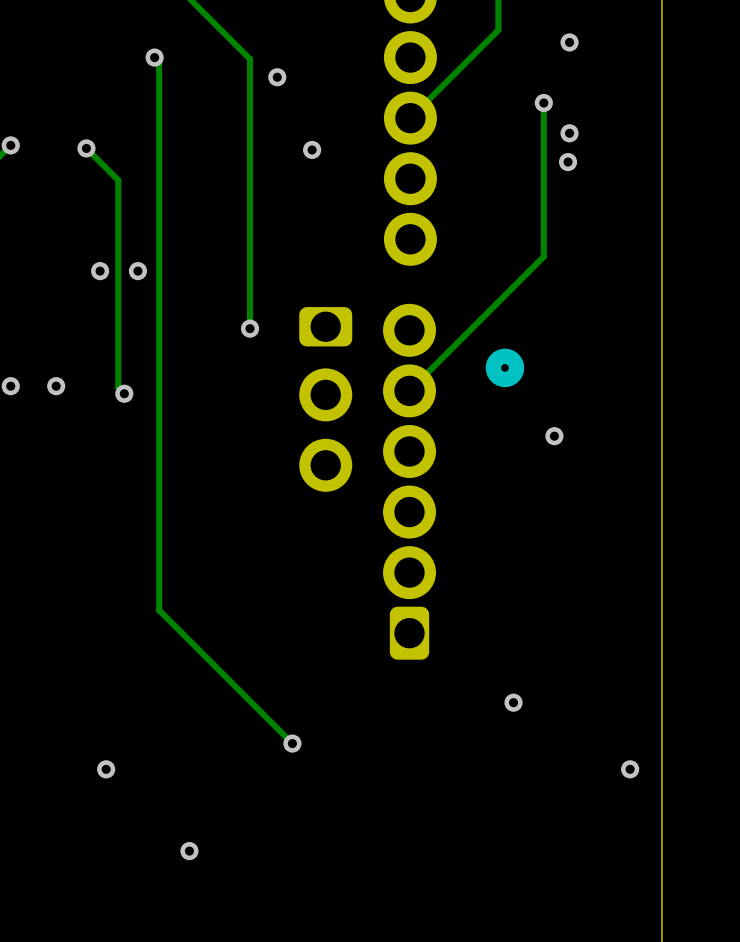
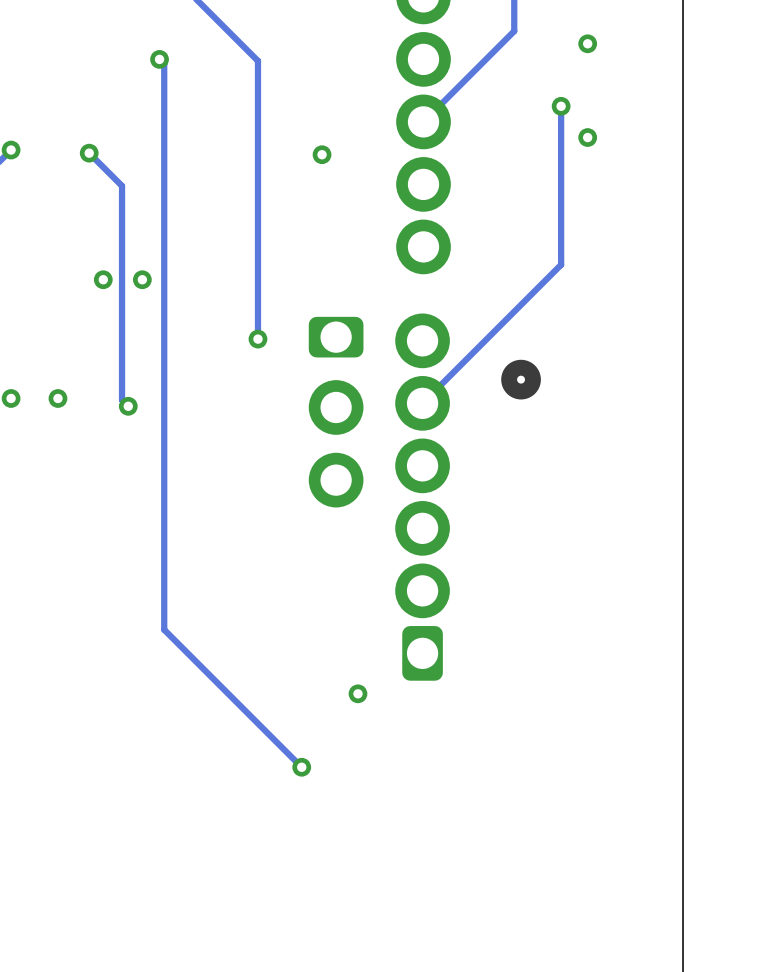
via: (277, 77) -> none
via: (568, 162) -> none
via: (554, 436) -> none
via: none -> (357, 693)
via: (513, 702) -> none
via: (106, 769) -> none
via: (630, 769) -> none
via: (189, 851) -> none

